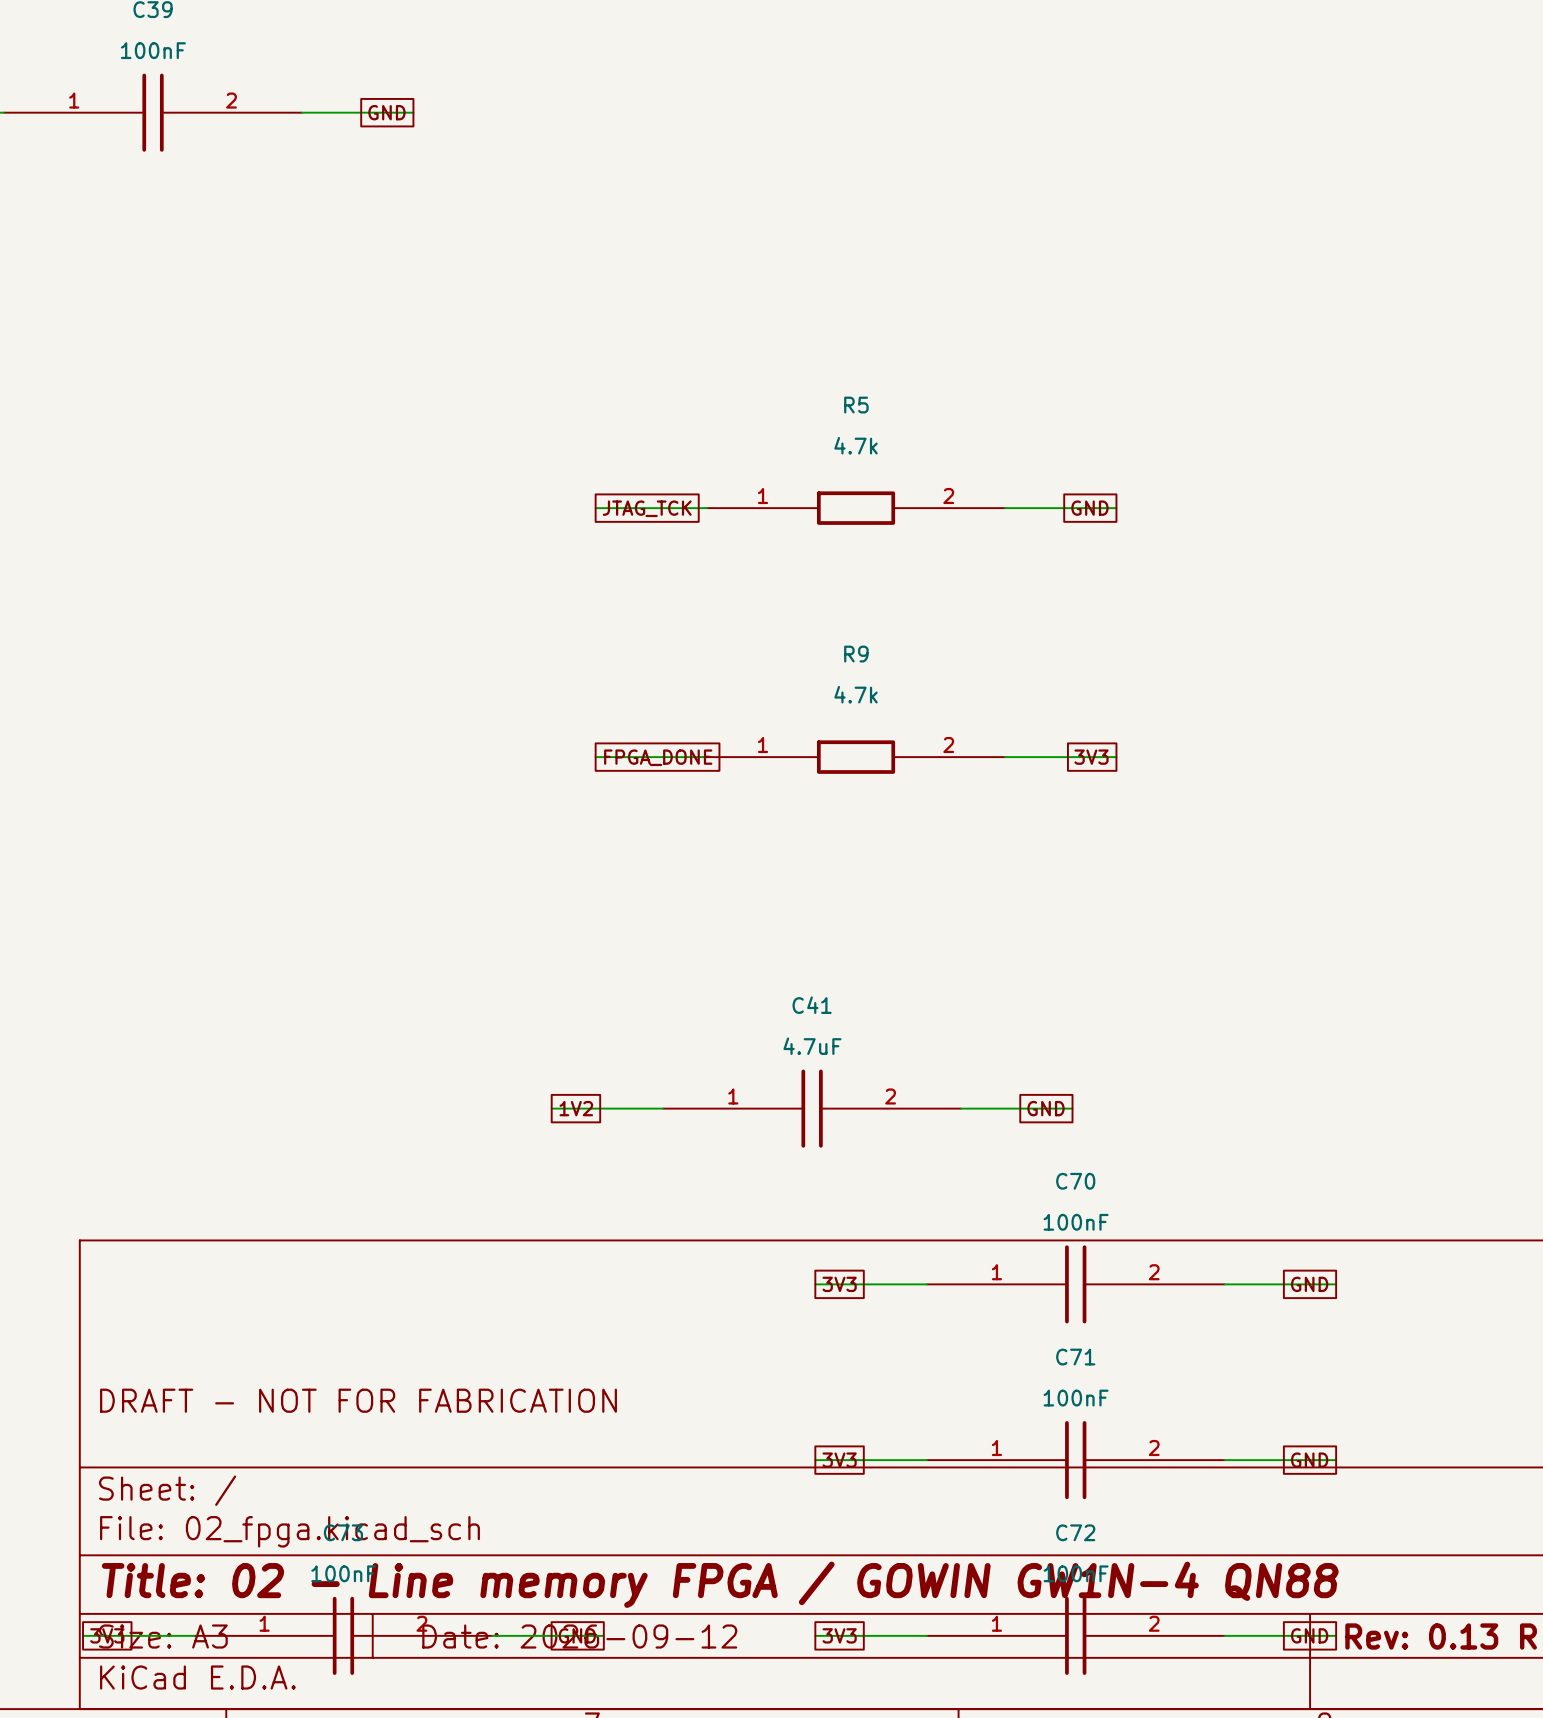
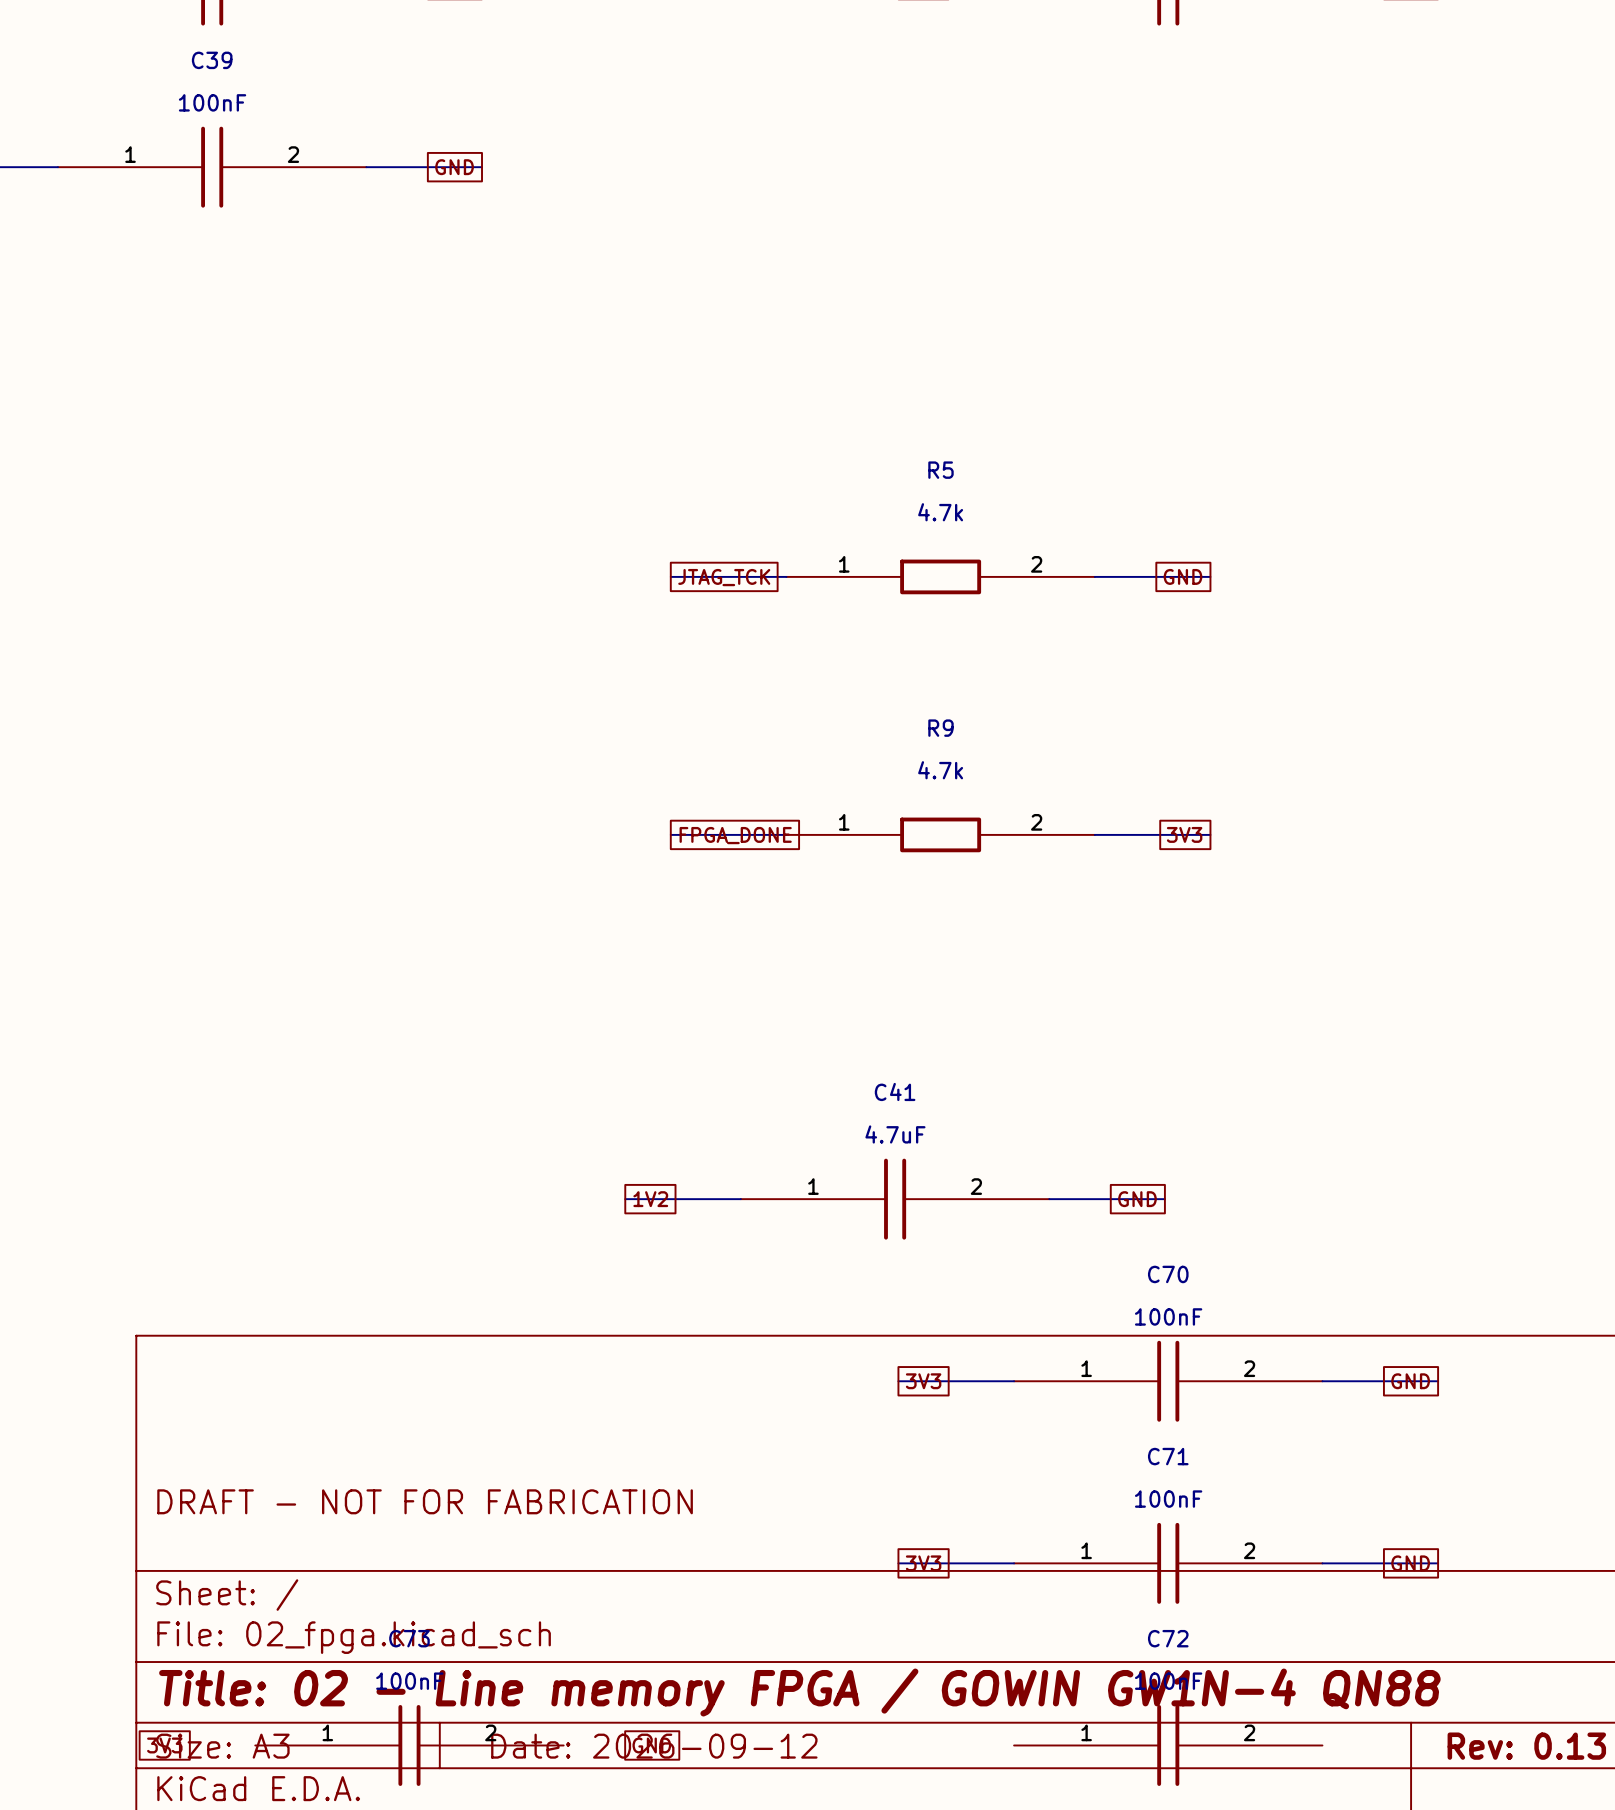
wire: (83, 1635) (194, 1635) -> none
wire: (492, 1635) (603, 1635) -> none
wire: (815, 1635) (926, 1635) -> none
global label: 3V3 (839, 1635) -> none
wire: (1224, 1635) (1336, 1635) -> none
global label: GND (1309, 1635) -> none

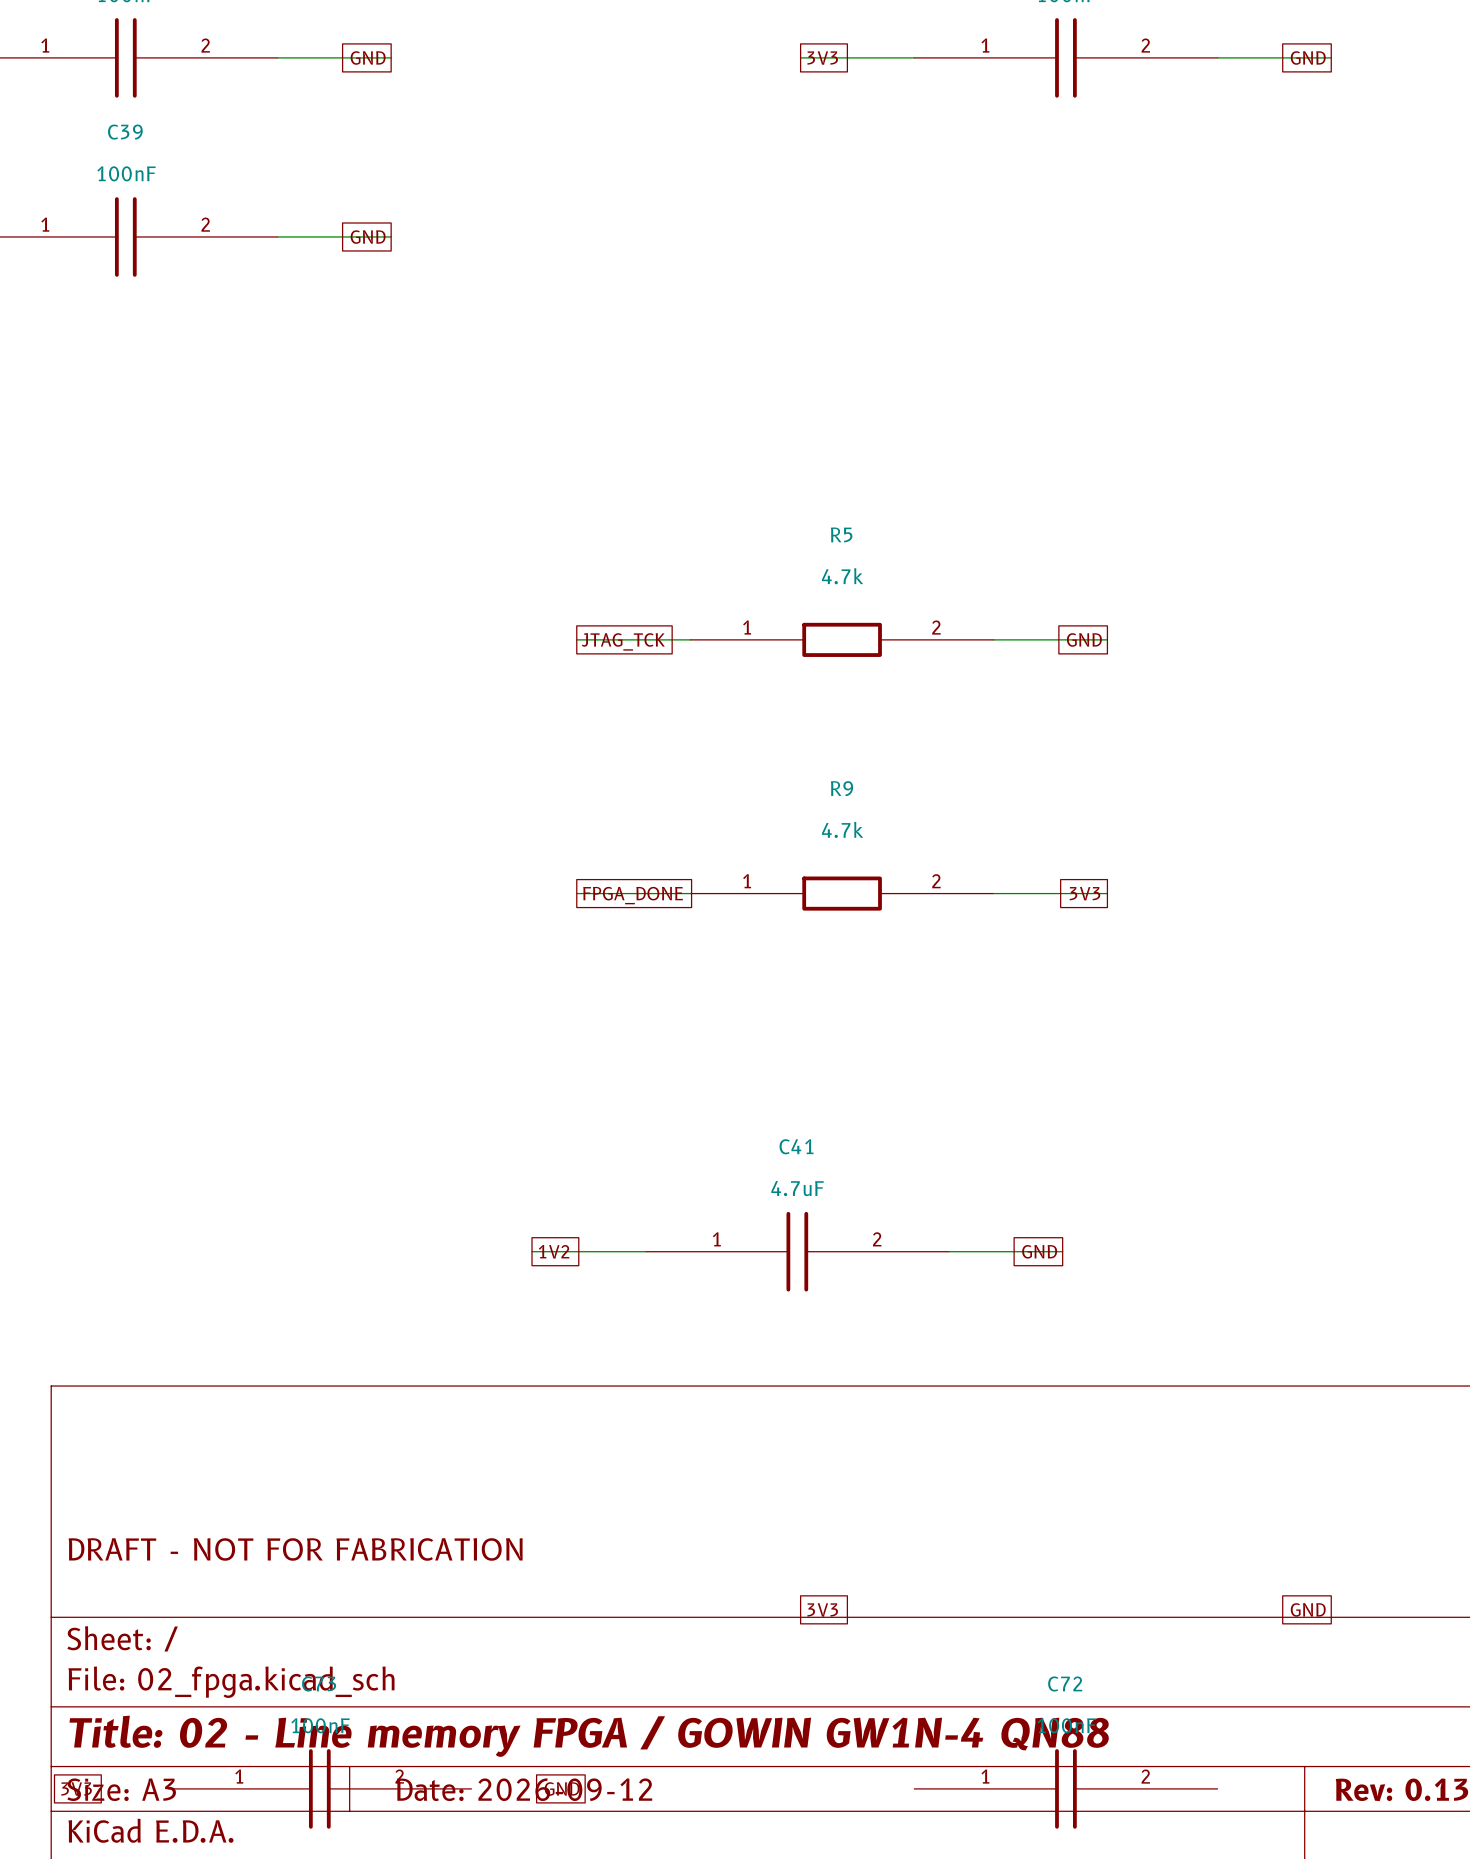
wire: (898, 1381) (1014, 1381) -> none
global label: 3V3 (923, 1381) -> none
C70: 100nF (1168, 1381) -> none
wire: (1322, 1381) (1438, 1381) -> none
global label: GND (1410, 1381) -> none
wire: (898, 1563) (1014, 1563) -> none
C71: 100nF (1168, 1563) -> none
wire: (1322, 1563) (1438, 1563) -> none

